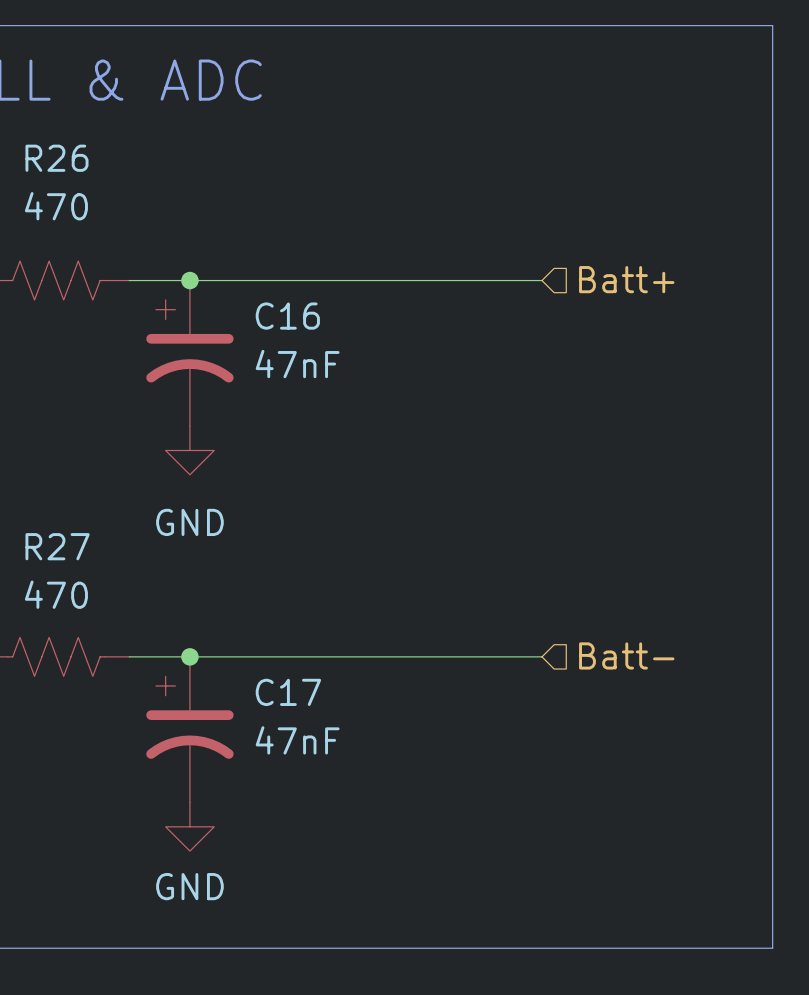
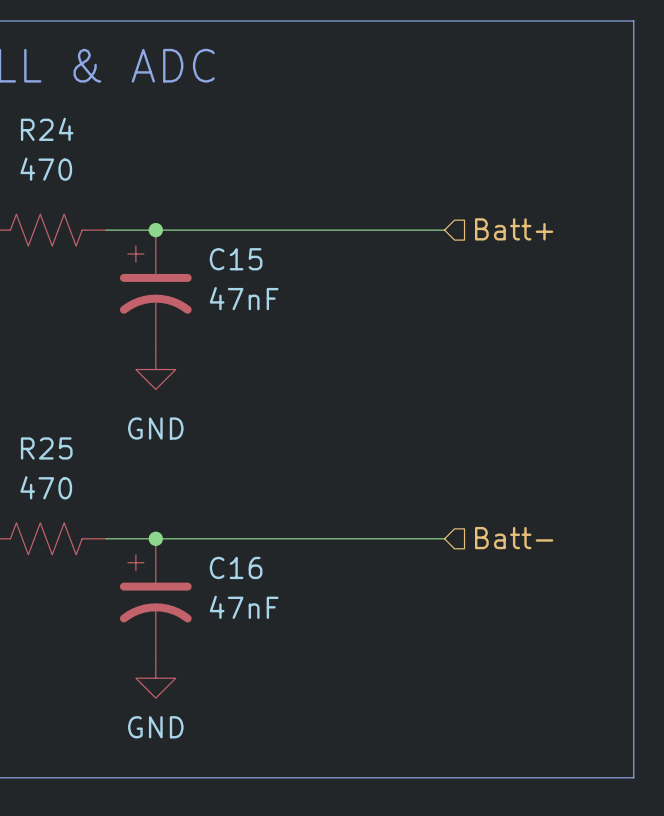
R26 name: R26 (56, 158) -> R24 (47, 129)
C16 name: C16 (287, 316) -> C15 (236, 259)
R27 name: R27 (57, 546) -> R25 (46, 448)
C17 name: C17 (288, 692) -> C16 (236, 567)

